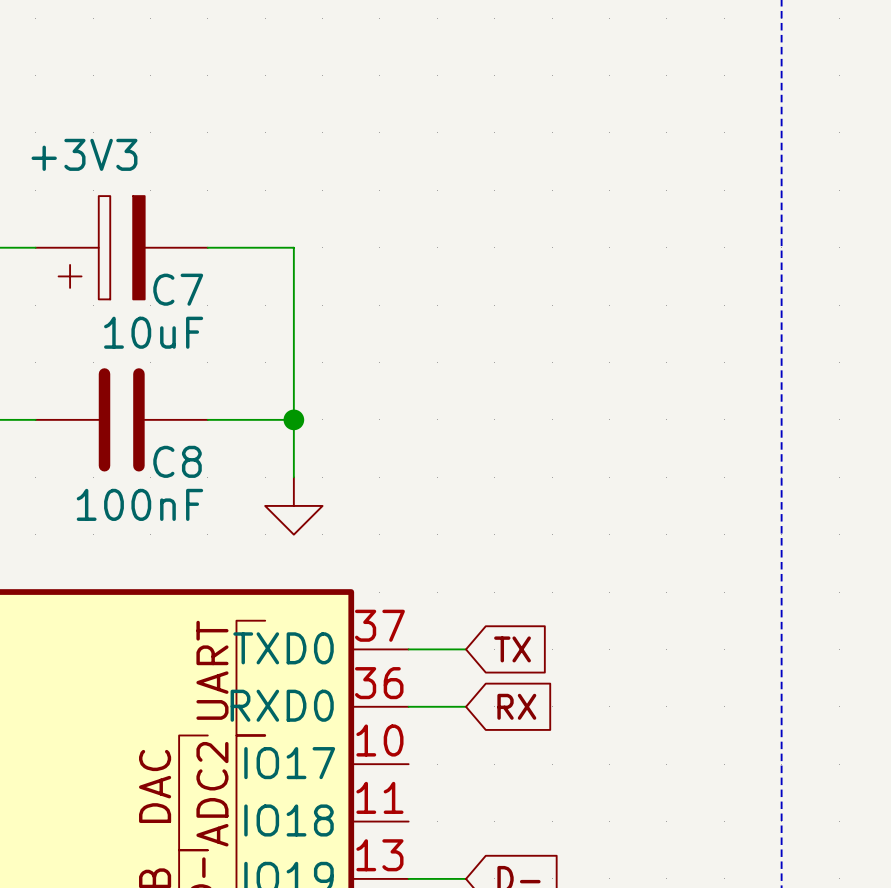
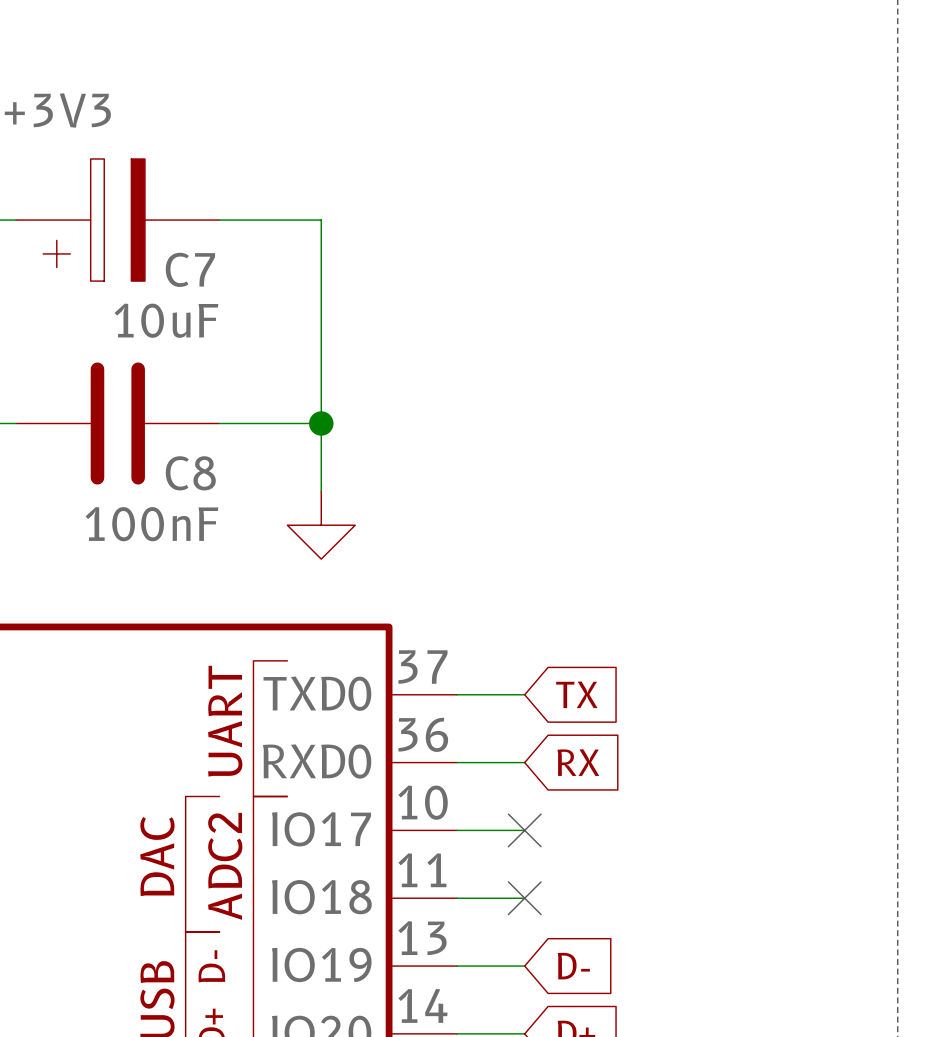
wire: none -> (456, 830) (524, 830)
no-connect mark: none -> (524, 830)
wire: none -> (456, 898) (524, 898)
no-connect mark: none -> (524, 898)

